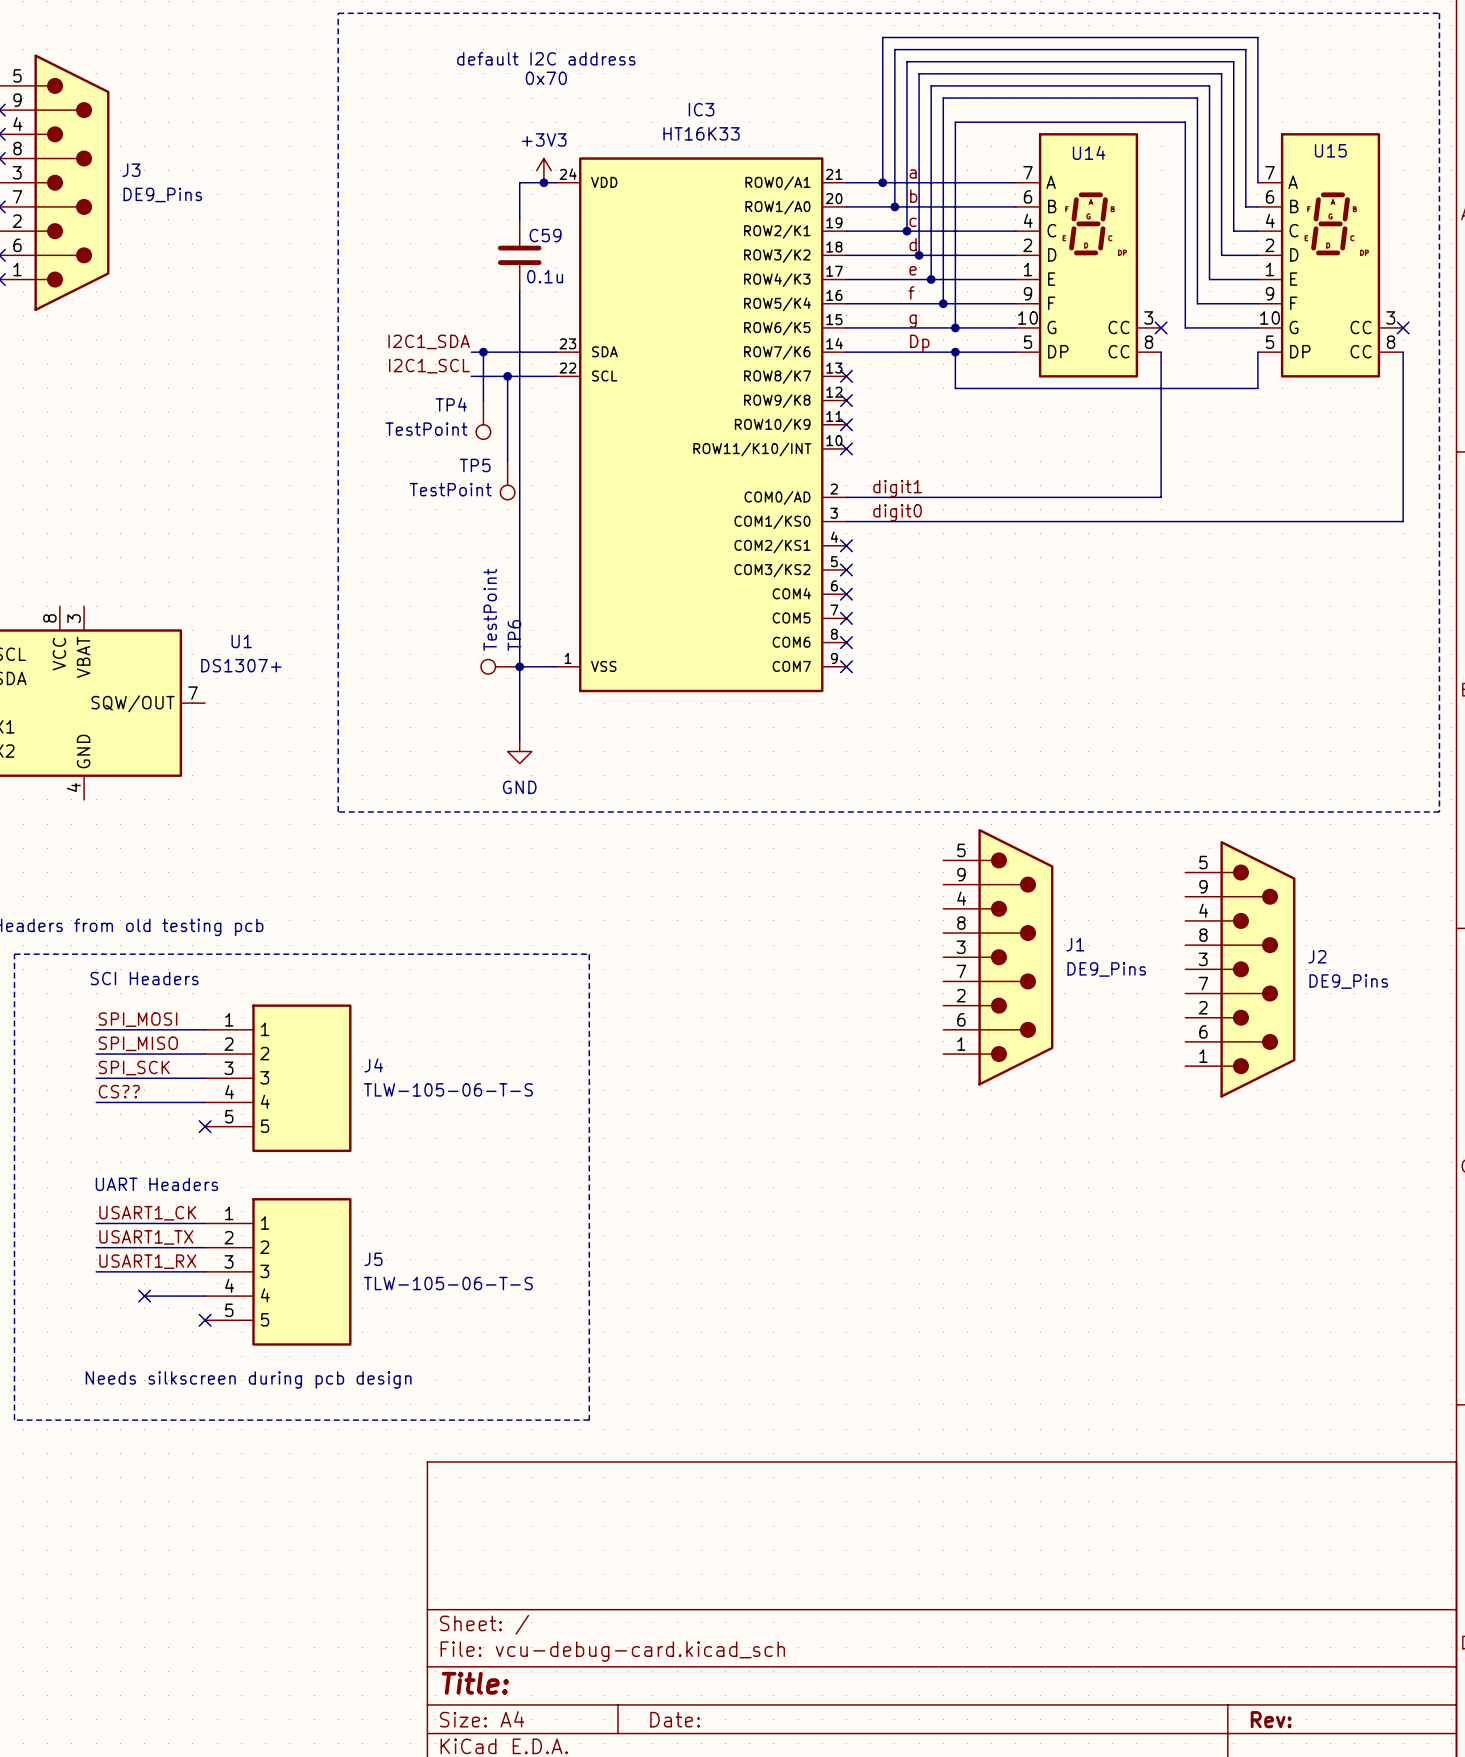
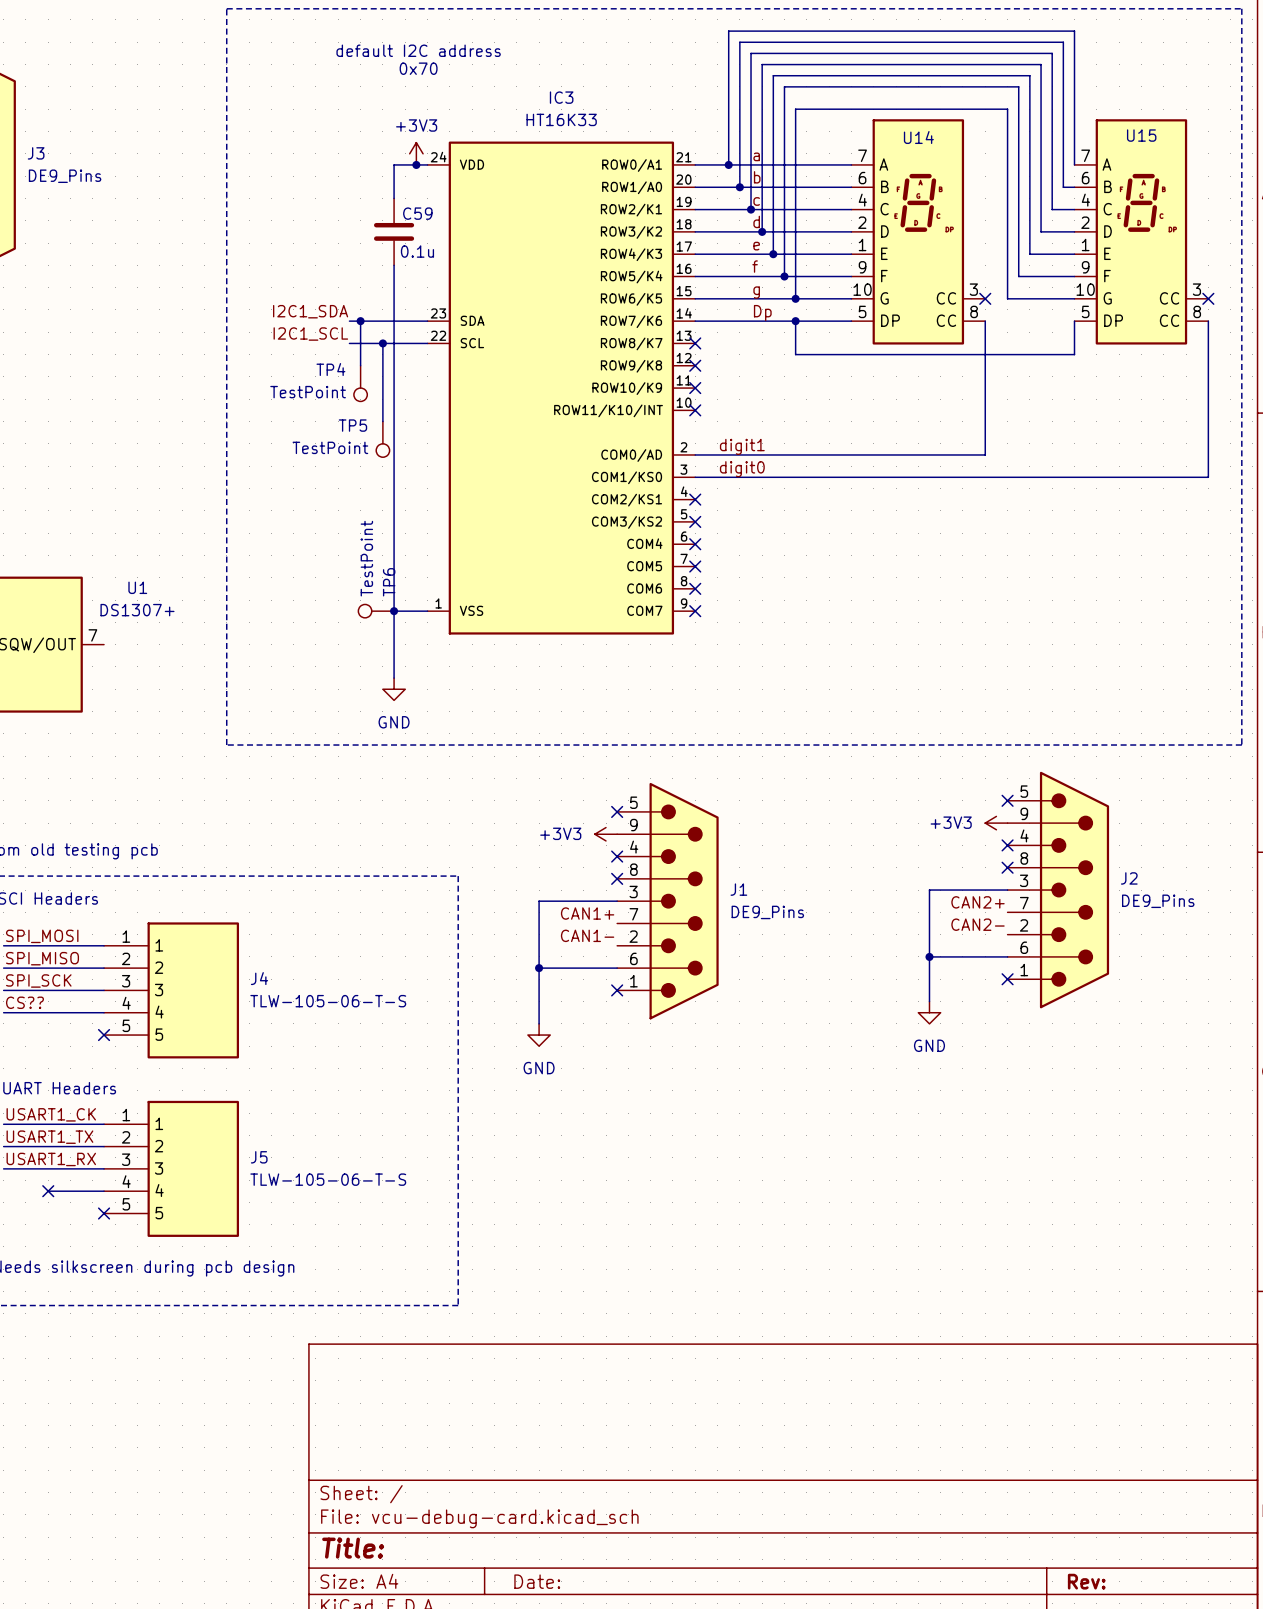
no-connect mark: none -> (1007, 800)
no-connect mark: none -> (617, 811)
power symbol: none -> +3V3 (996, 823)
power symbol: none -> +3V3 (606, 834)
no-connect mark: none -> (1007, 845)
no-connect mark: none -> (617, 856)
no-connect mark: none -> (1007, 867)
no-connect mark: none -> (617, 878)
J1 position: (998, 957) -> (667, 901)
wire: none -> (1007, 890) (929, 890) (929, 1001)
wire: none -> (617, 901) (539, 901) (539, 1023)
label: none -> CAN2+ (978, 902)
label: none -> CAN1+ (587, 913)
label: none -> CAN2- (978, 924)
label: none -> CAN1- (587, 935)
wire: none -> (929, 956) (1007, 956)
junction: none -> (929, 956)
wire: none -> (539, 968) (617, 968)
junction: none -> (539, 968)
no-connect mark: none -> (1007, 979)
no-connect mark: none -> (617, 990)
power symbol: none -> GND (929, 1012)
power symbol: none -> GND (539, 1035)

